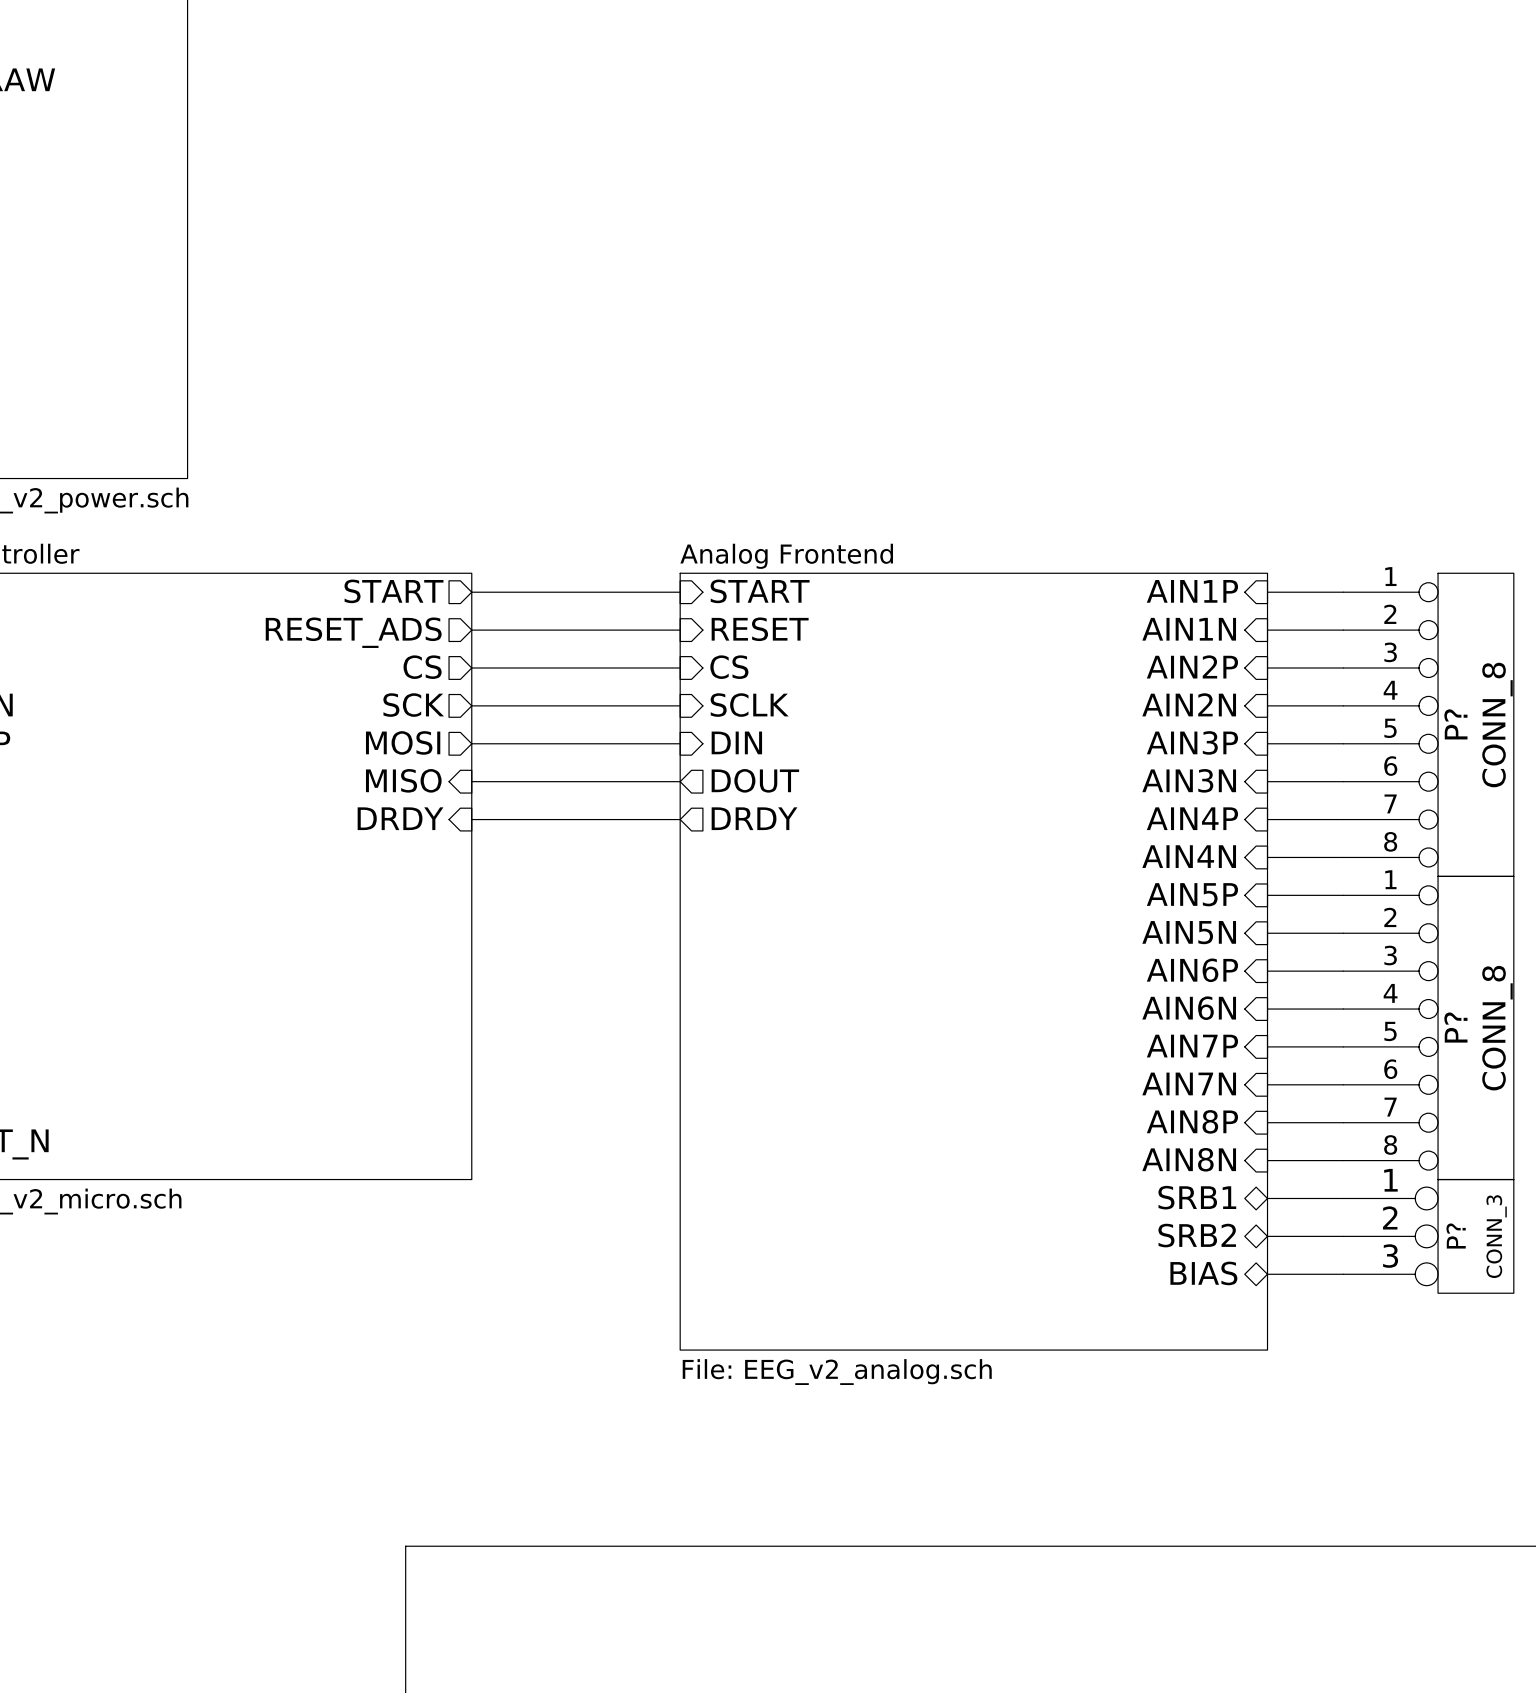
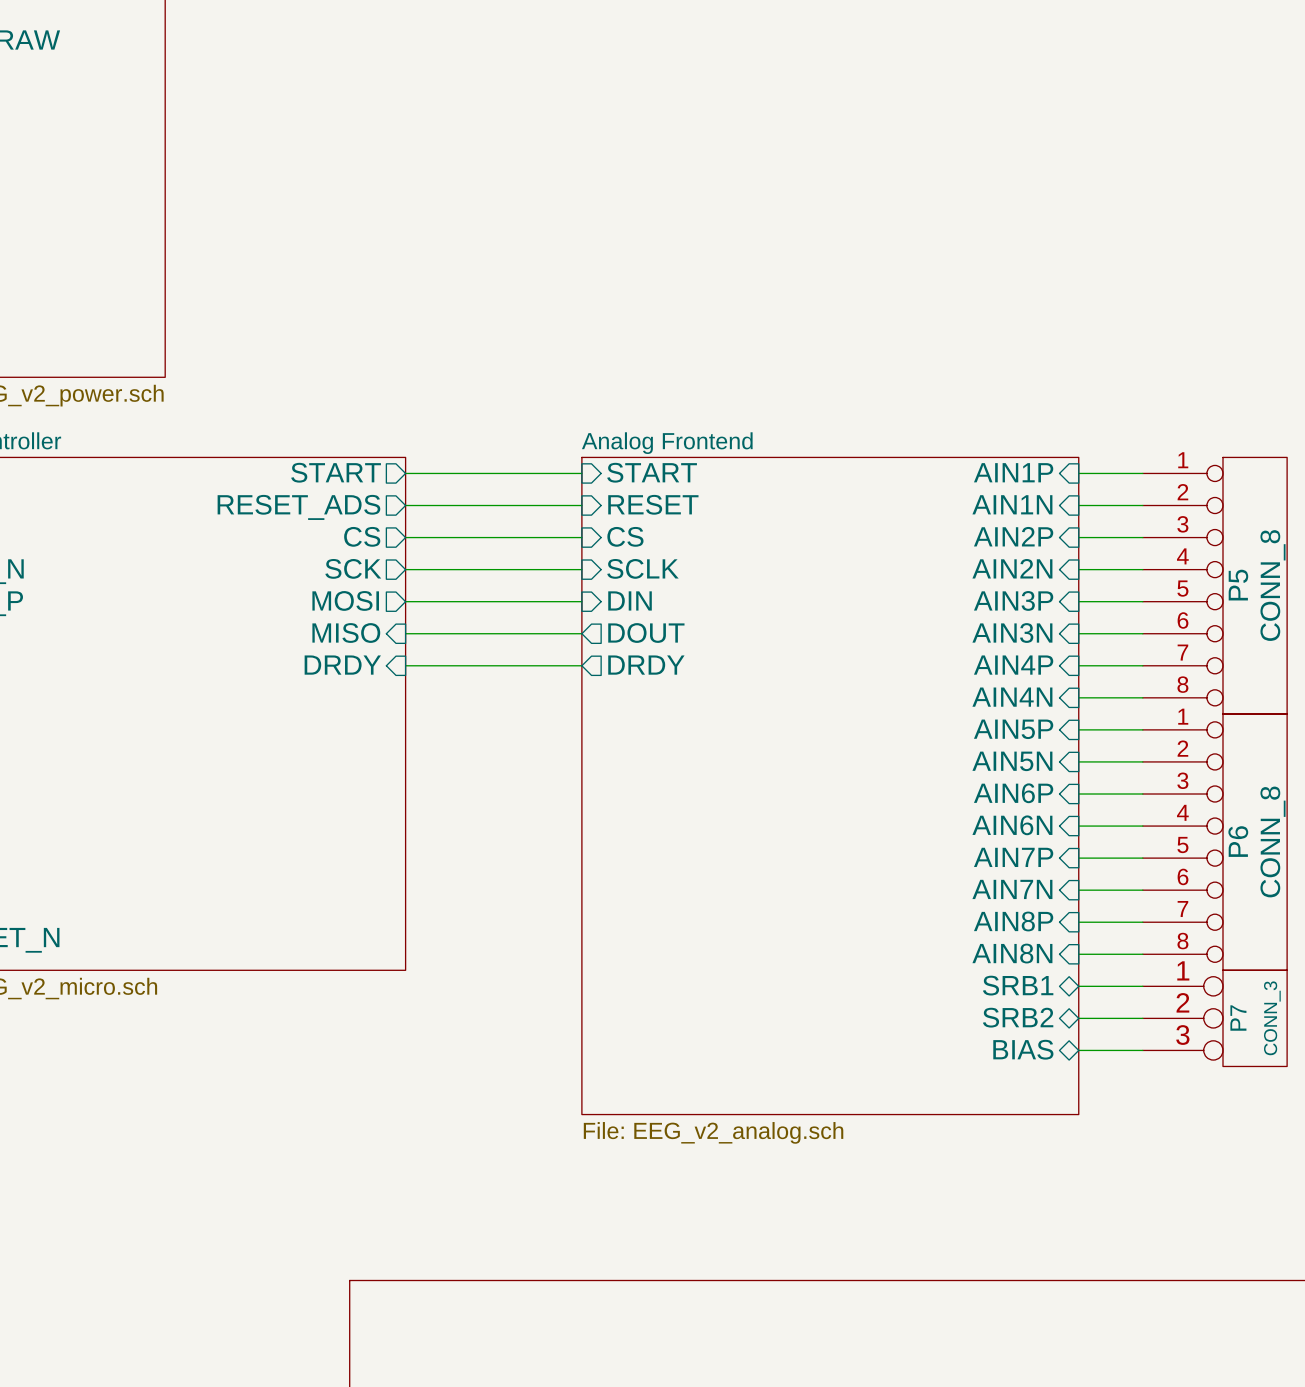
P? name: P? (1455, 724) -> P5 (1238, 585)
P? name: P? (1455, 1027) -> P6 (1238, 841)
P? name: P? (1456, 1236) -> P7 (1238, 1018)

